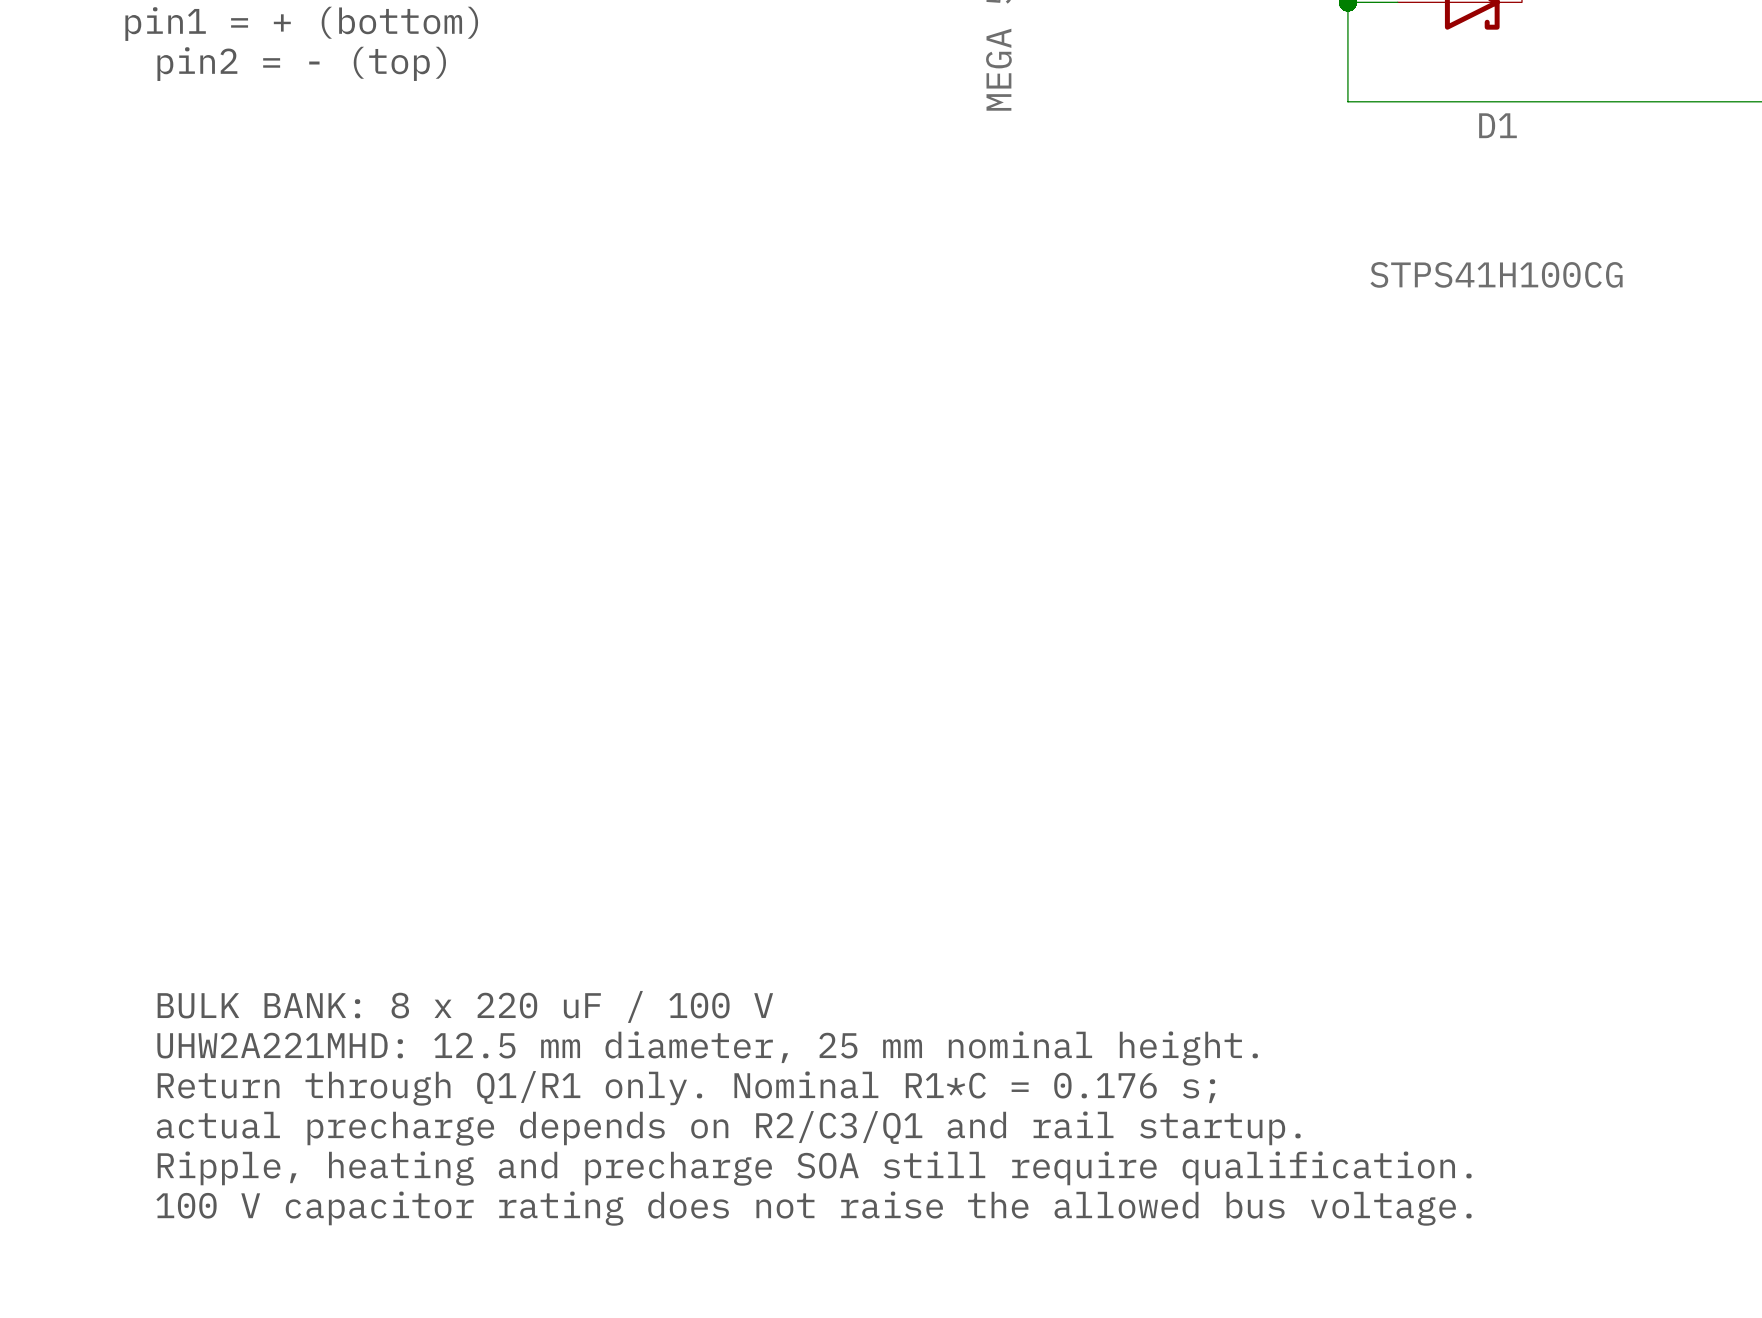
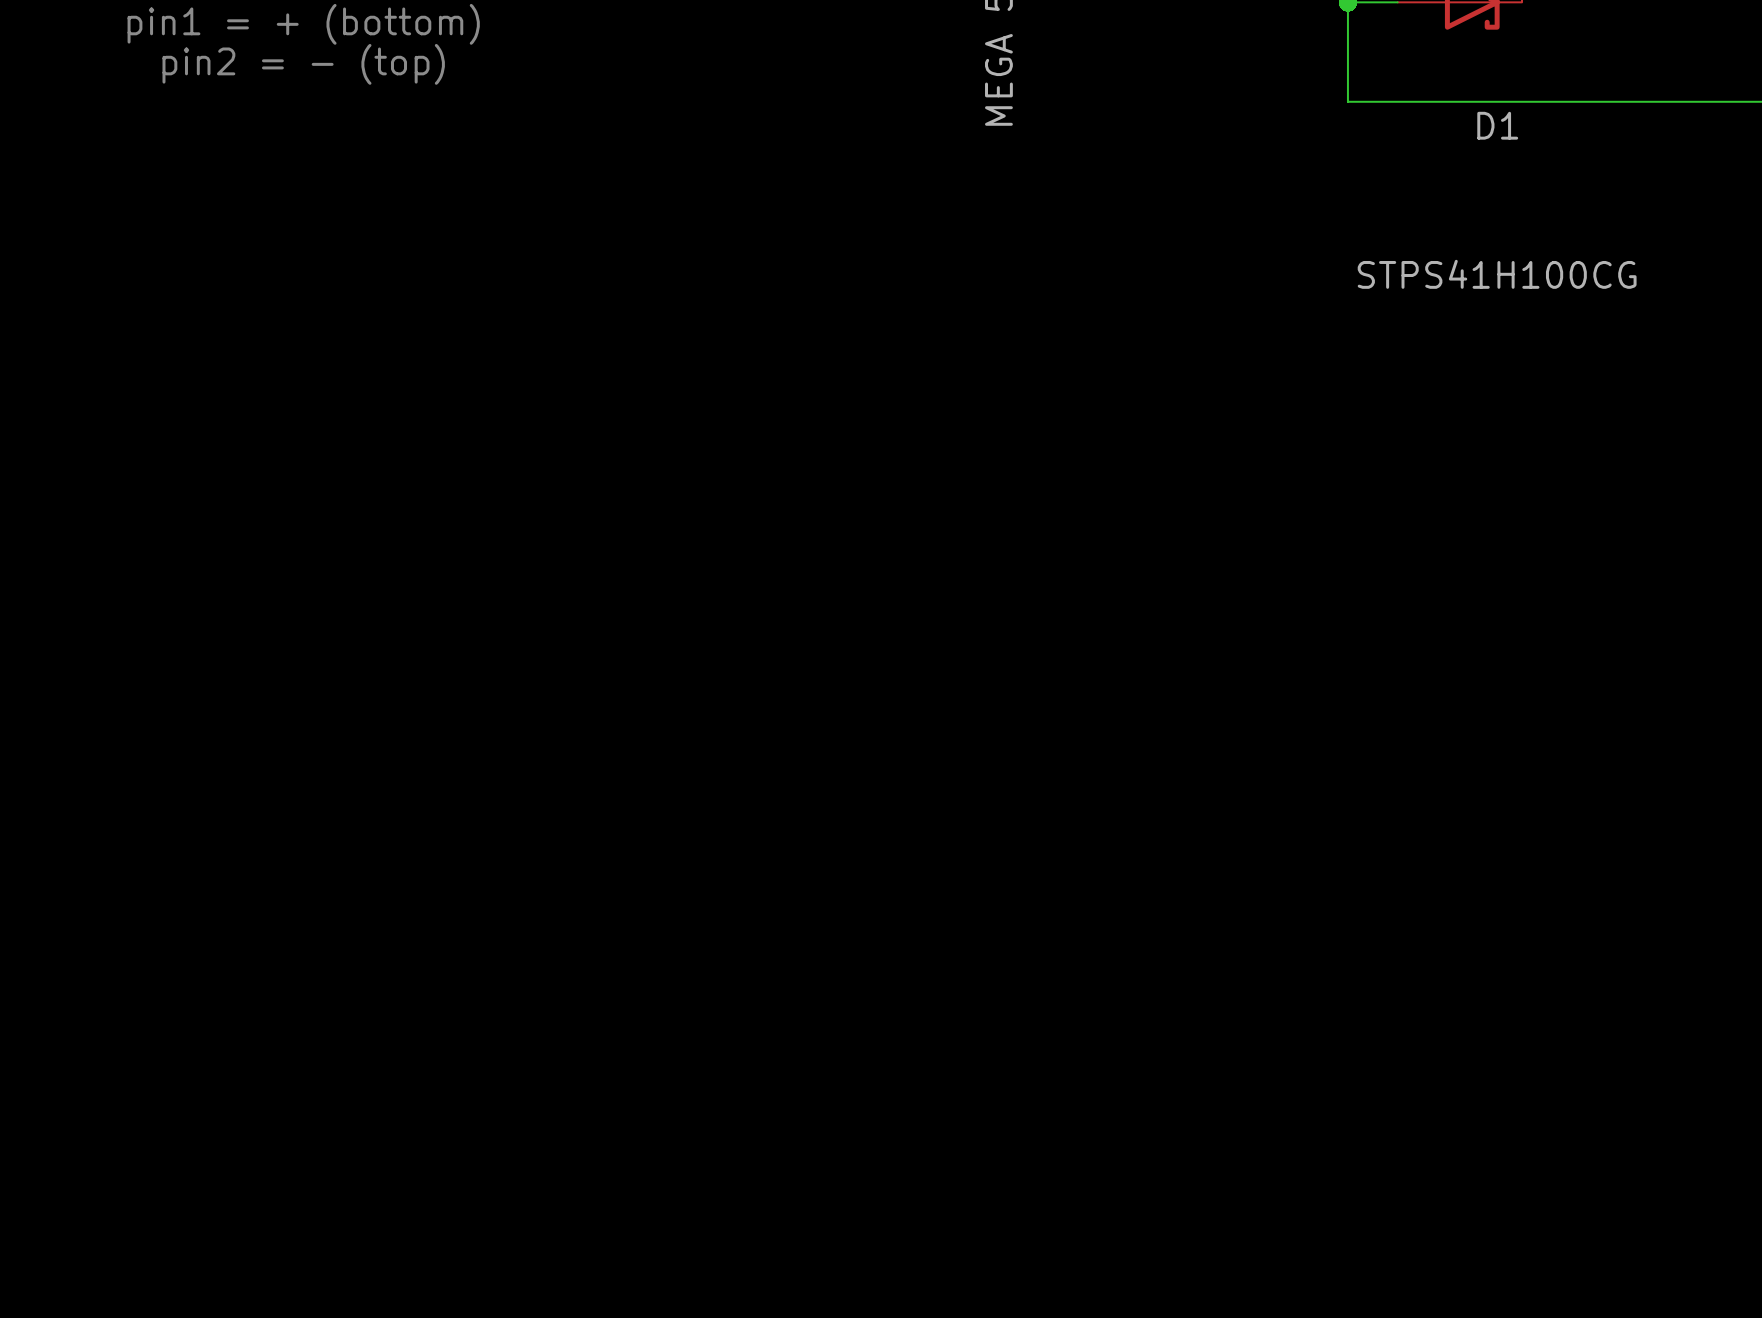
text: BULK BANK: 8 x 220 uF / 100 V (465, 1006) -> none
text: UHW2A221MHD: 12.5 mm diameter, 25 mm nominal height. (707, 1048) -> none
text: Return through Q1/R1 only. Nominal R1*C = 0.176 s; (686, 1088) -> none
text: actual precharge depends on R2/C3/Q1 and rail startup. (728, 1128) -> none
text: Ripple, heating and precharge SOA still require qualification. (814, 1168) -> none
text: 100 V capacitor rating does not raise the allowed bus voltage. (814, 1208) -> none

